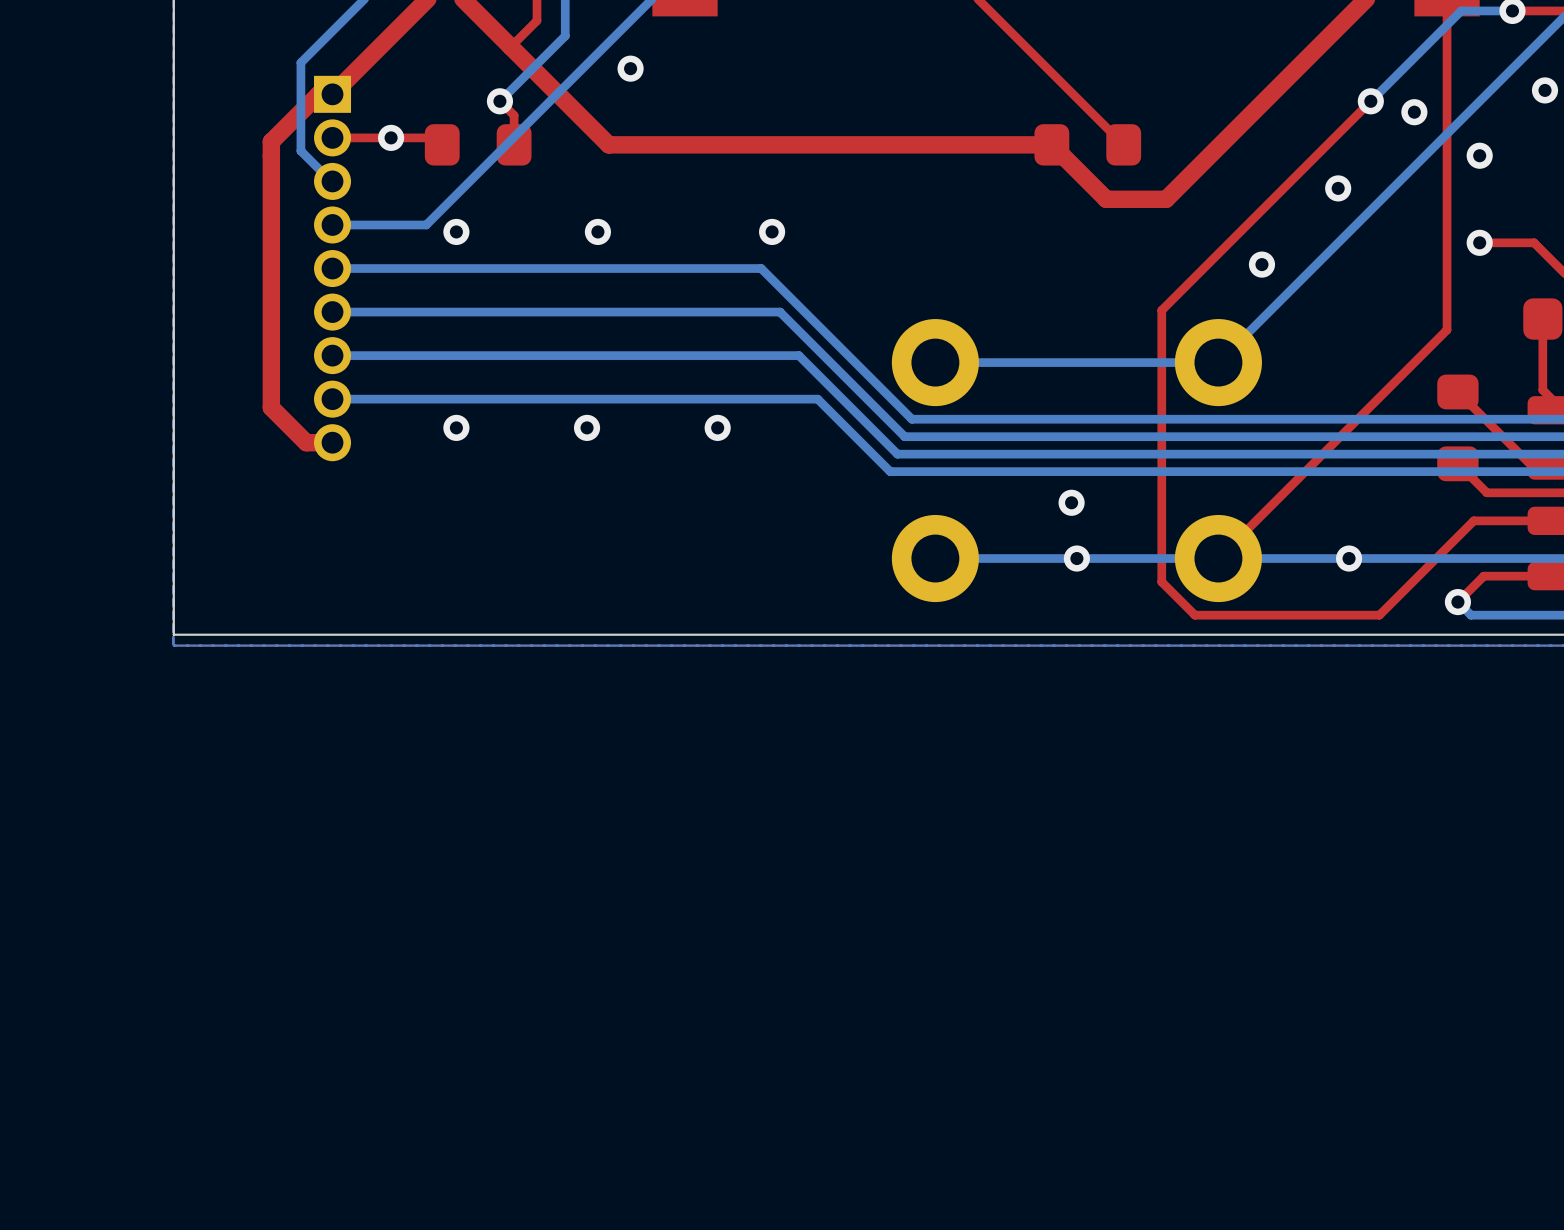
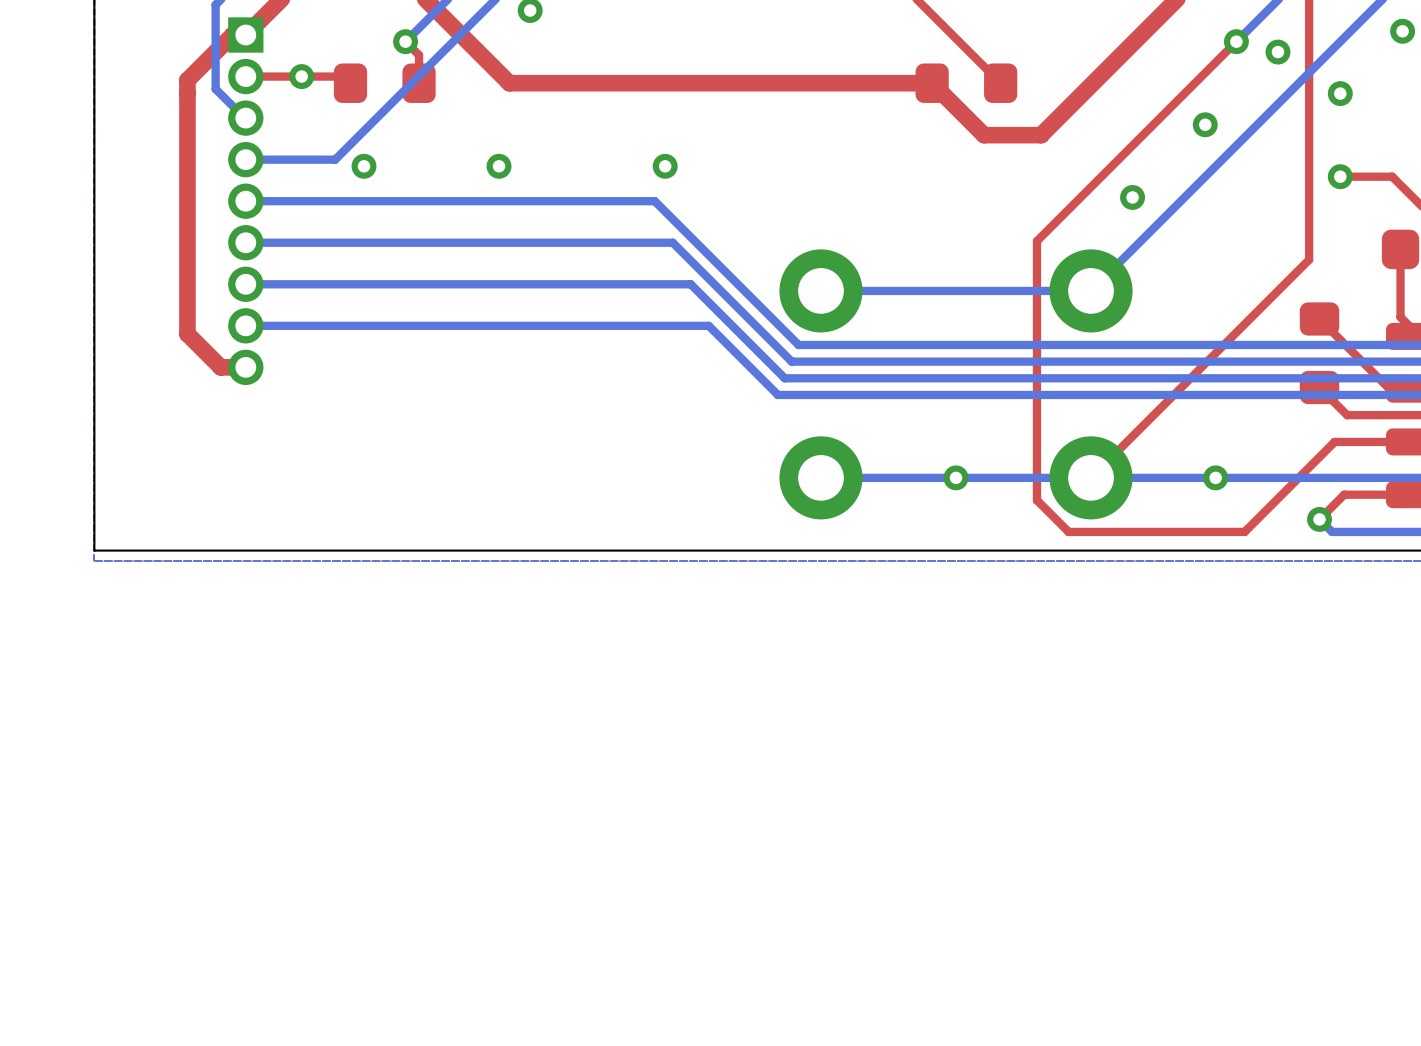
via: (456, 427) -> none
via: (587, 427) -> none
via: (717, 427) -> none
via: (1071, 502) -> none

